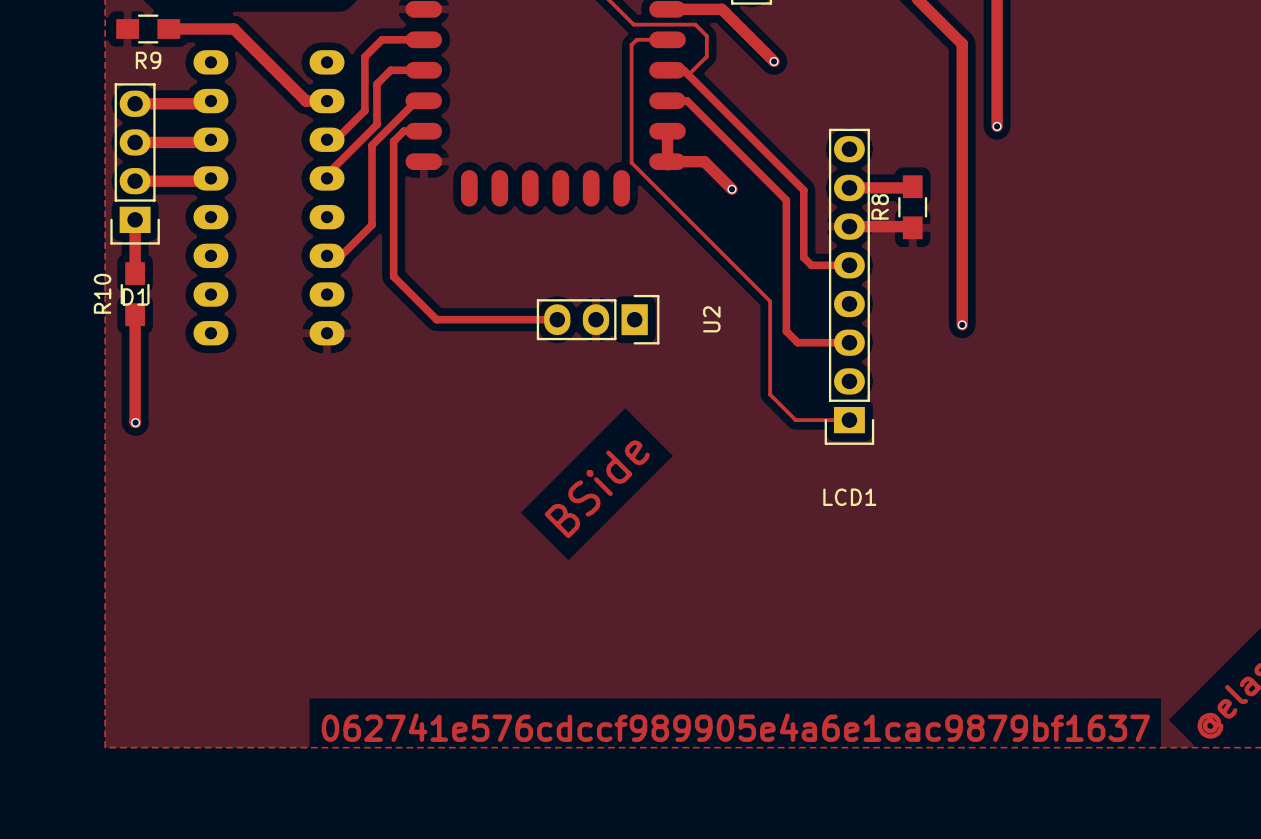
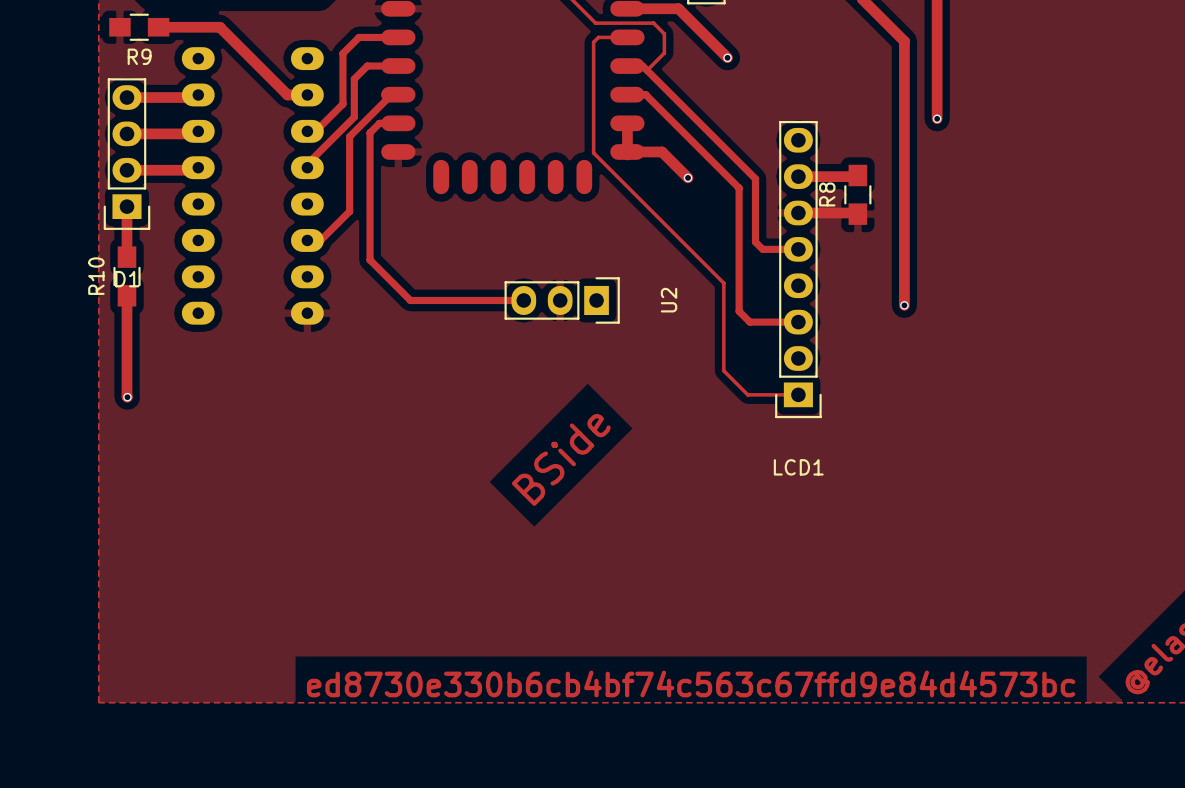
text: 062741e576cdccf989905e4a6e1cac9879bf1637 (735, 727) -> ed8730e330b6cb4bf74c563c67ffd9e84d4573bc (691, 683)

